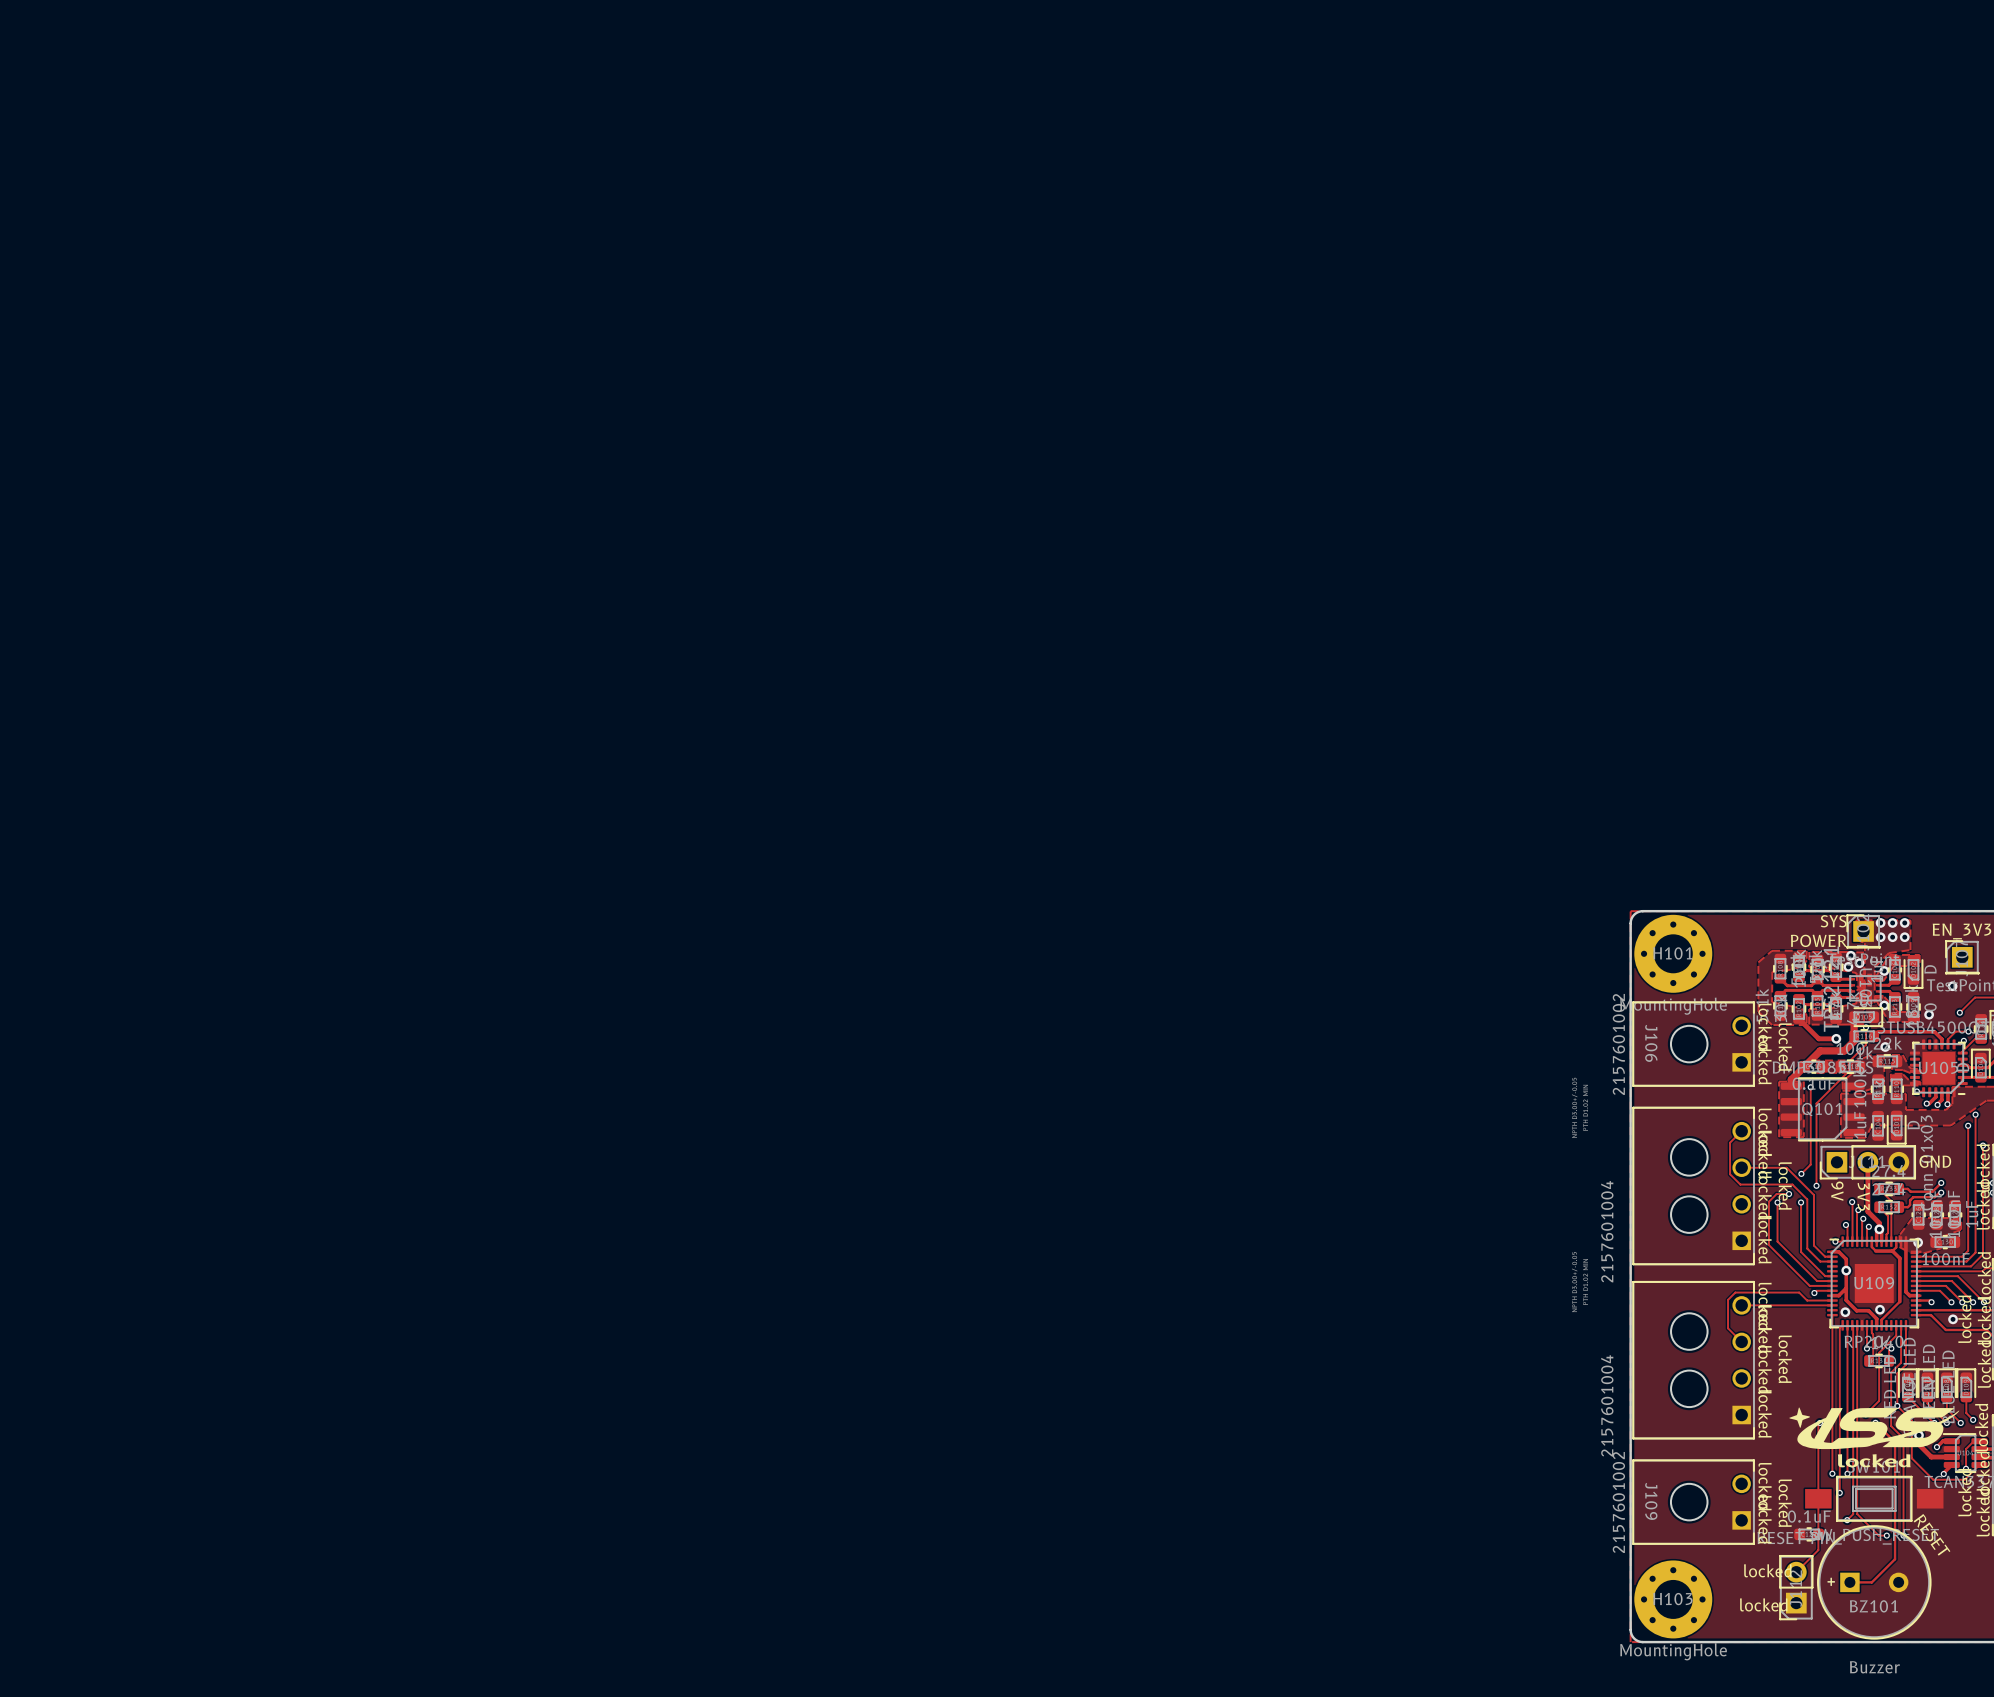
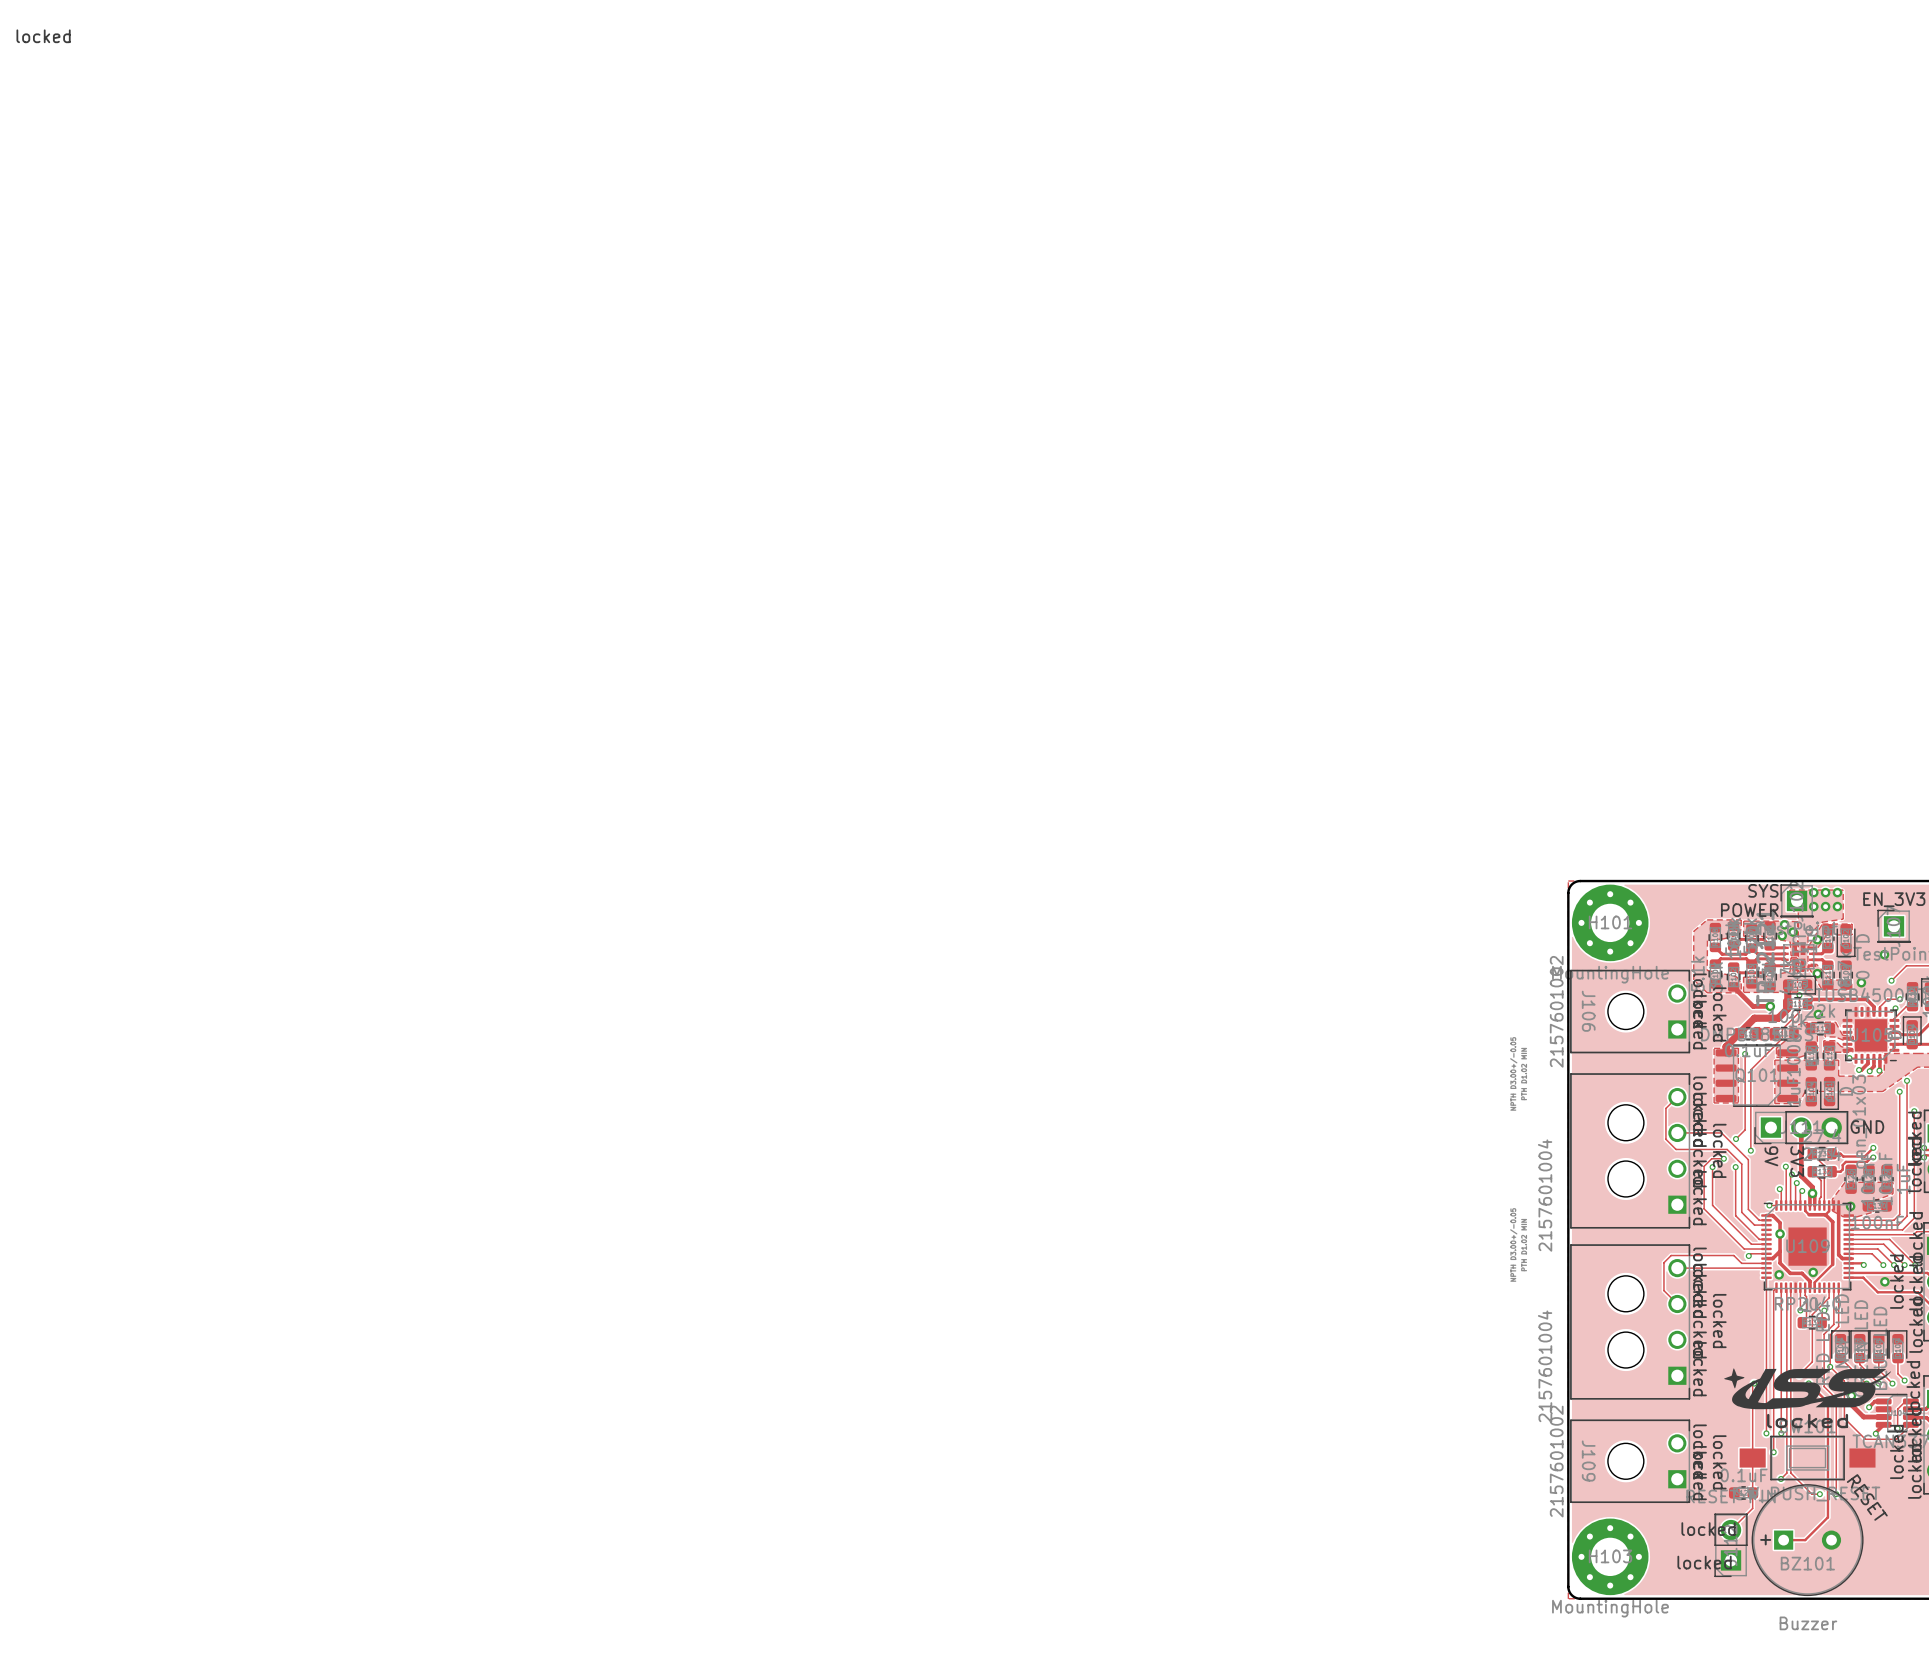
text: none -> locked (43, 36)

